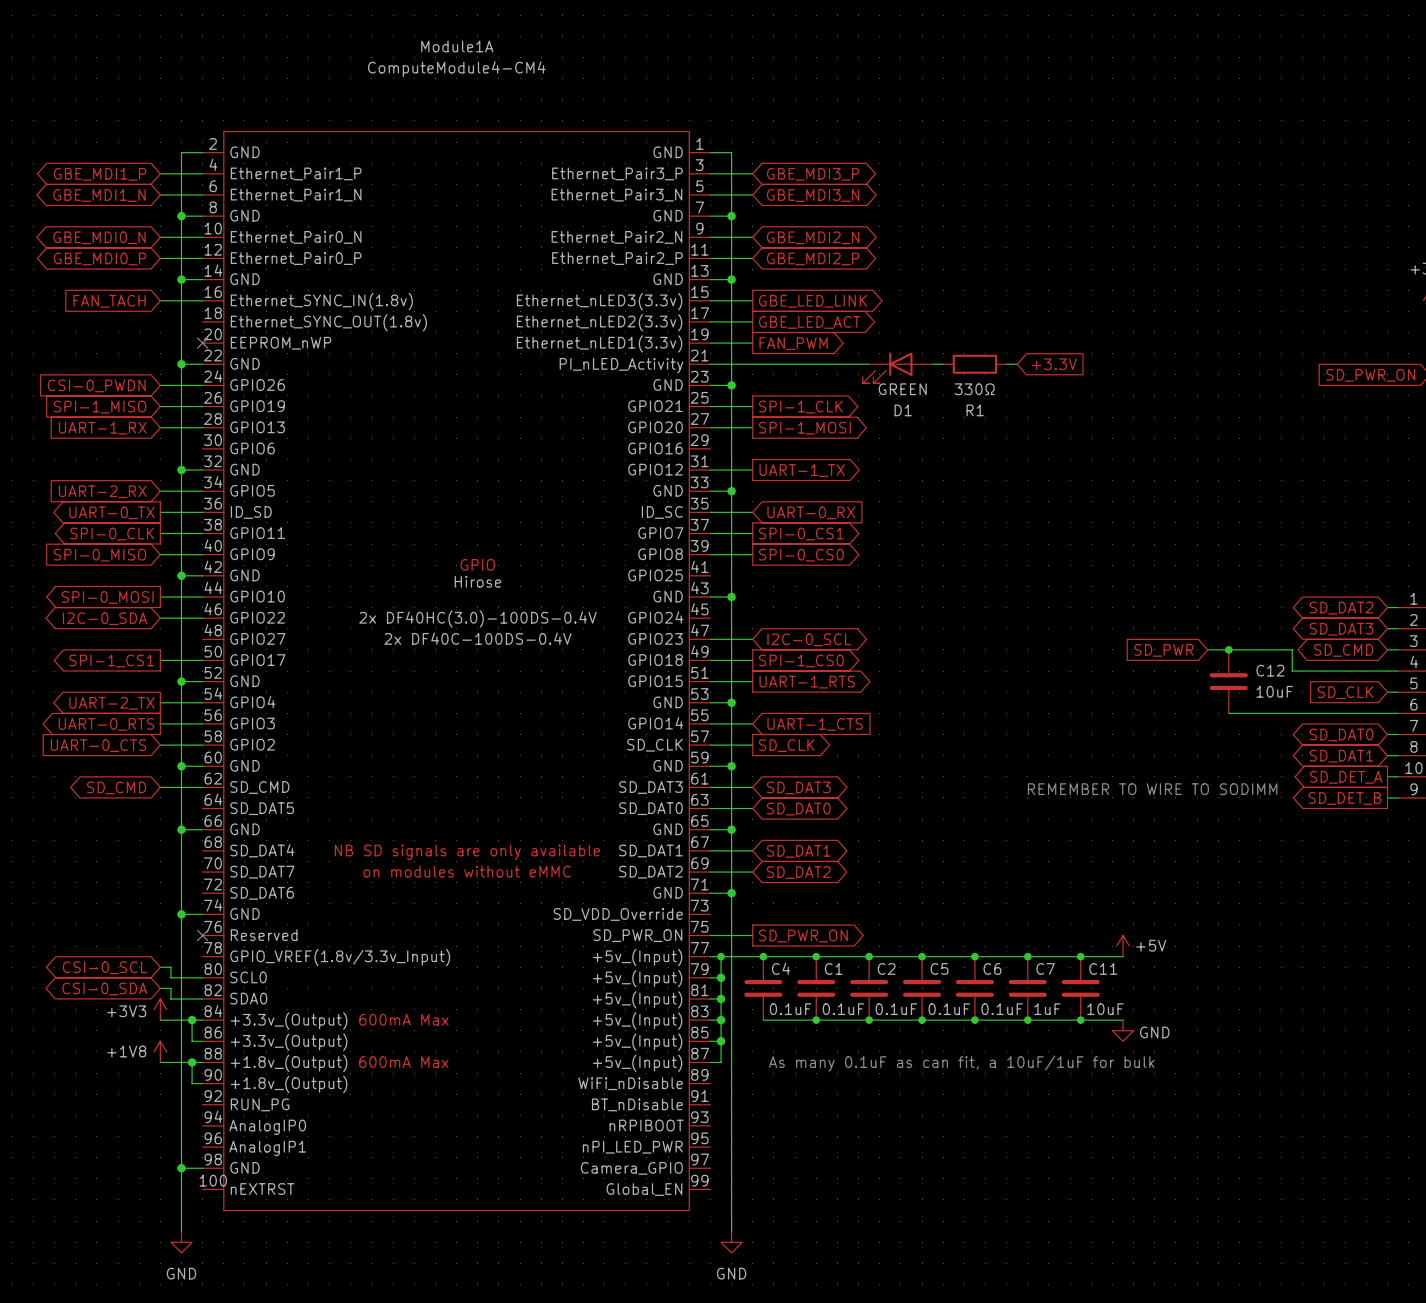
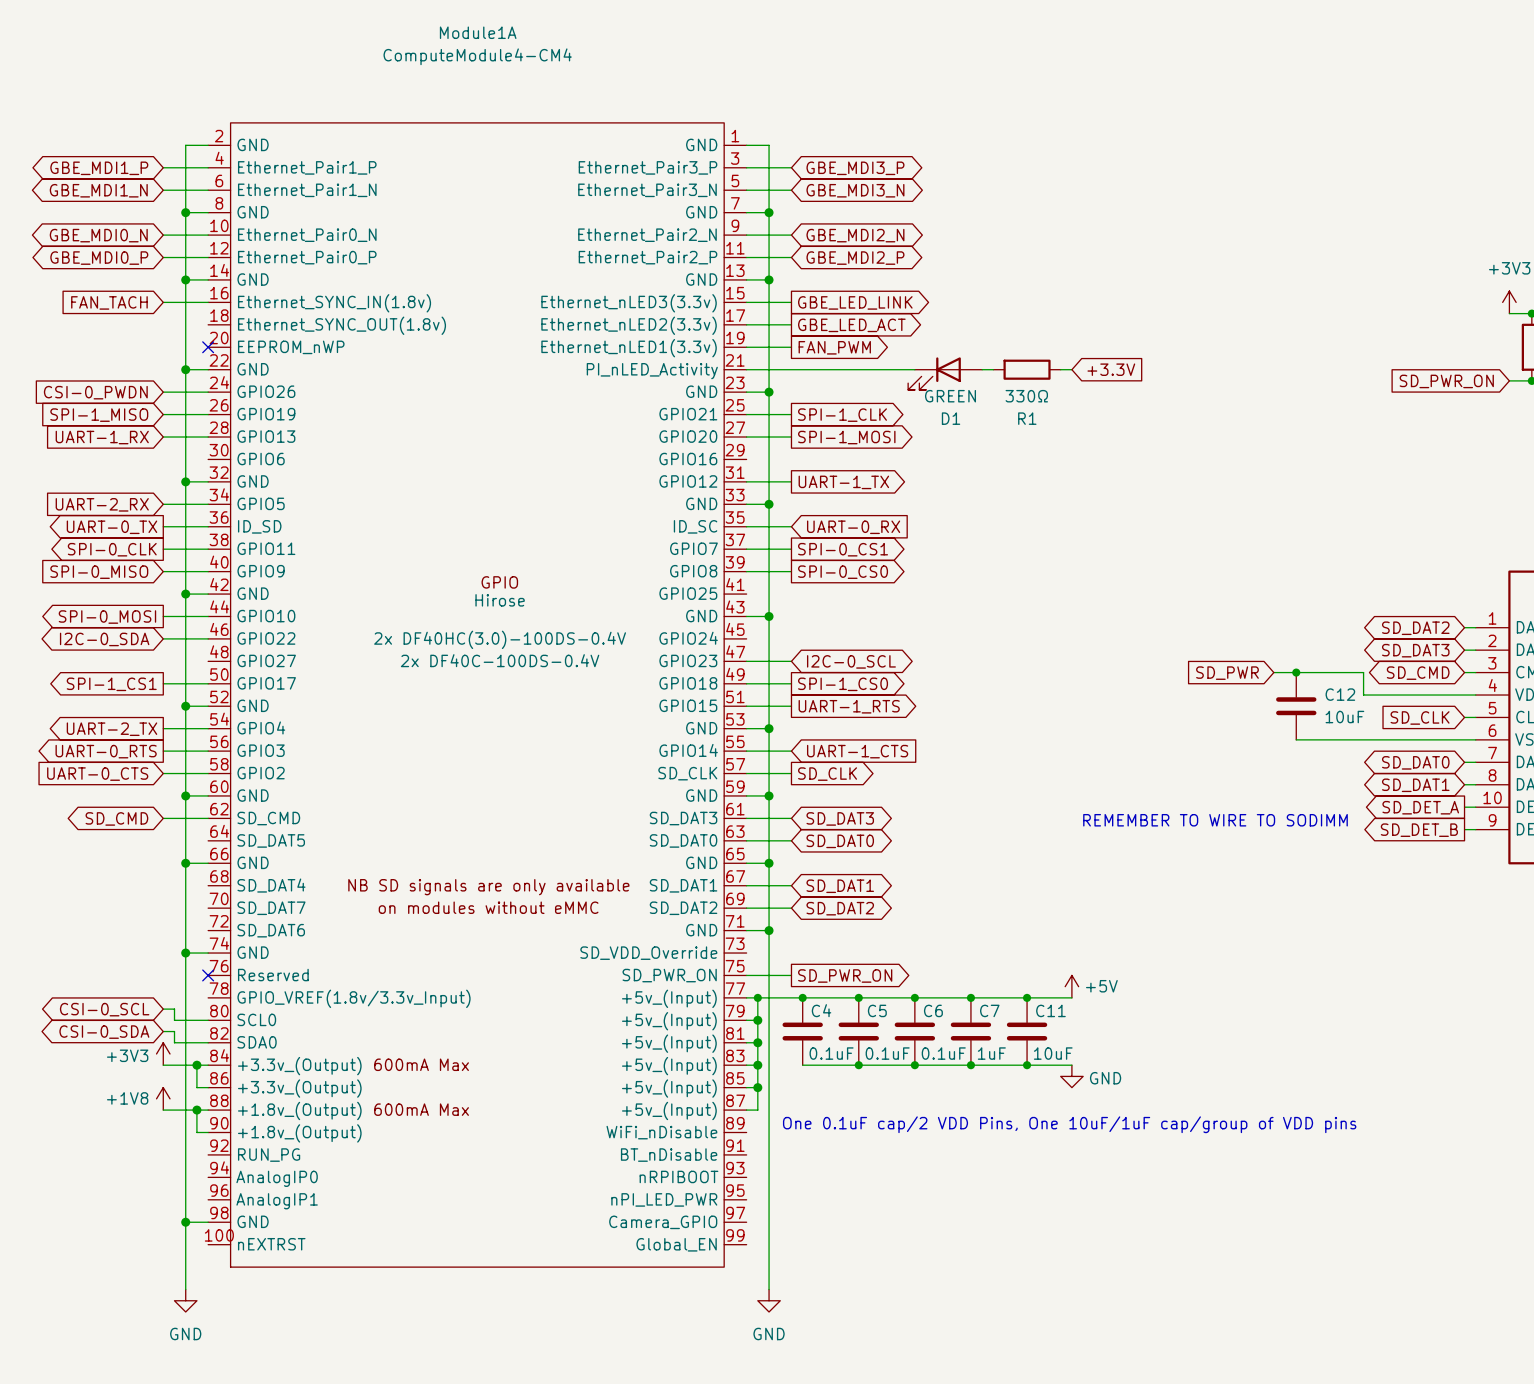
power symbol position: +5V (1123, 946) -> +5V (1071, 986)
wire: (1017, 956) (1123, 956) -> none
junction: (1027, 956) -> none
junction: (1080, 956) -> none
C1 name: C1 (833, 968) -> C5 (877, 1010)
C2 name: C2 (886, 968) -> C6 (933, 1010)
C5 name: C5 (939, 968) -> C7 (989, 1010)
C6 name: C6 (992, 968) -> C11 (1050, 1010)
C7: 1uF (1027, 988) -> none
C11: 10uF (1080, 988) -> none
C5 value: 0.1uF (949, 1009) -> 1uF (991, 1053)
C6 value: 0.1uF (1002, 1009) -> 10uF (1053, 1053)
wire: (1017, 1020) (1123, 1020) -> none
junction: (1027, 1020) -> none
junction: (1080, 1020) -> none
power symbol position: GND (1123, 1030) -> GND (1071, 1076)
text: As many 0.1uF as can fit, a 10uF/1uF for bulk (961, 1063) -> none
text: none -> One 0.1uF cap/2 VDD Pins, One 10uF/1uF cap/group of VDD pins (1069, 1124)

